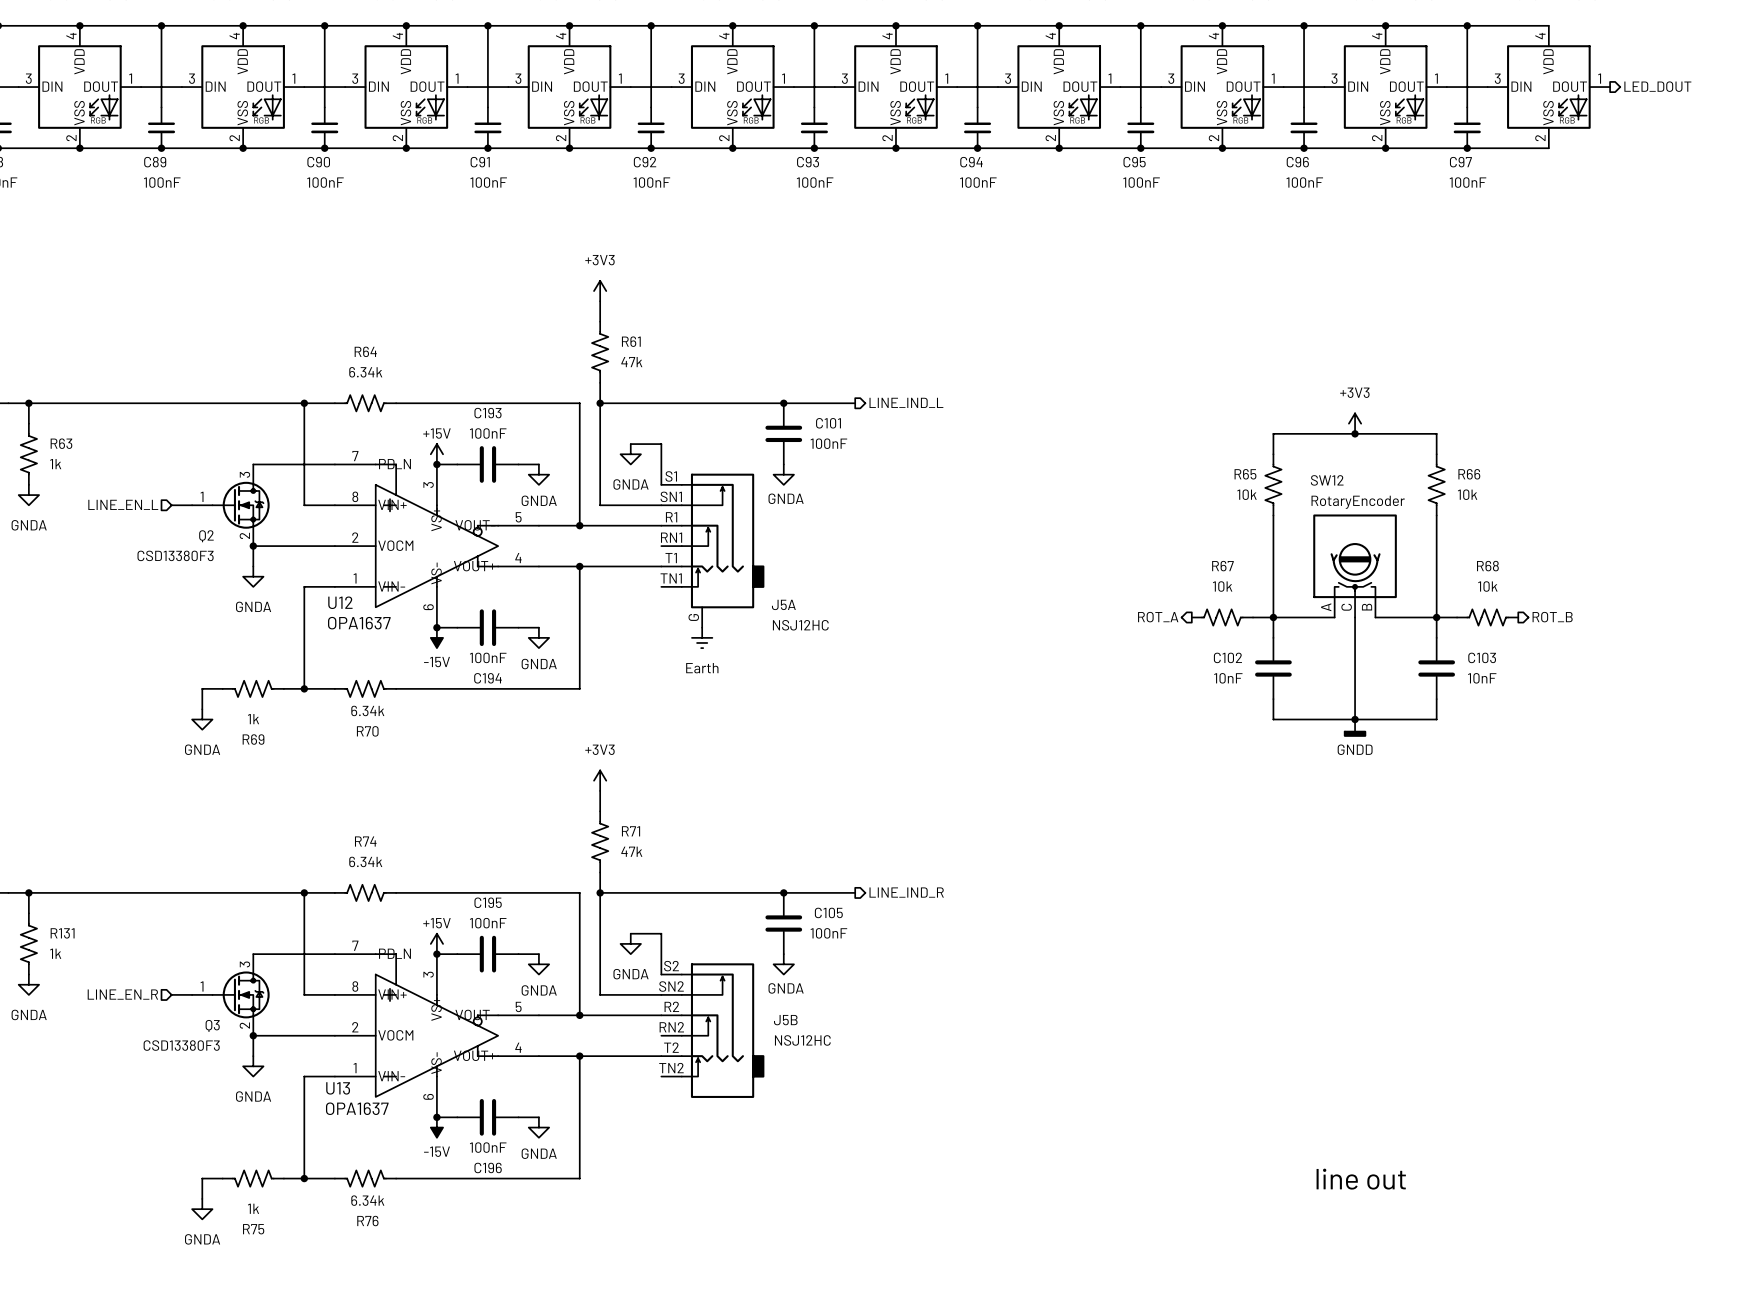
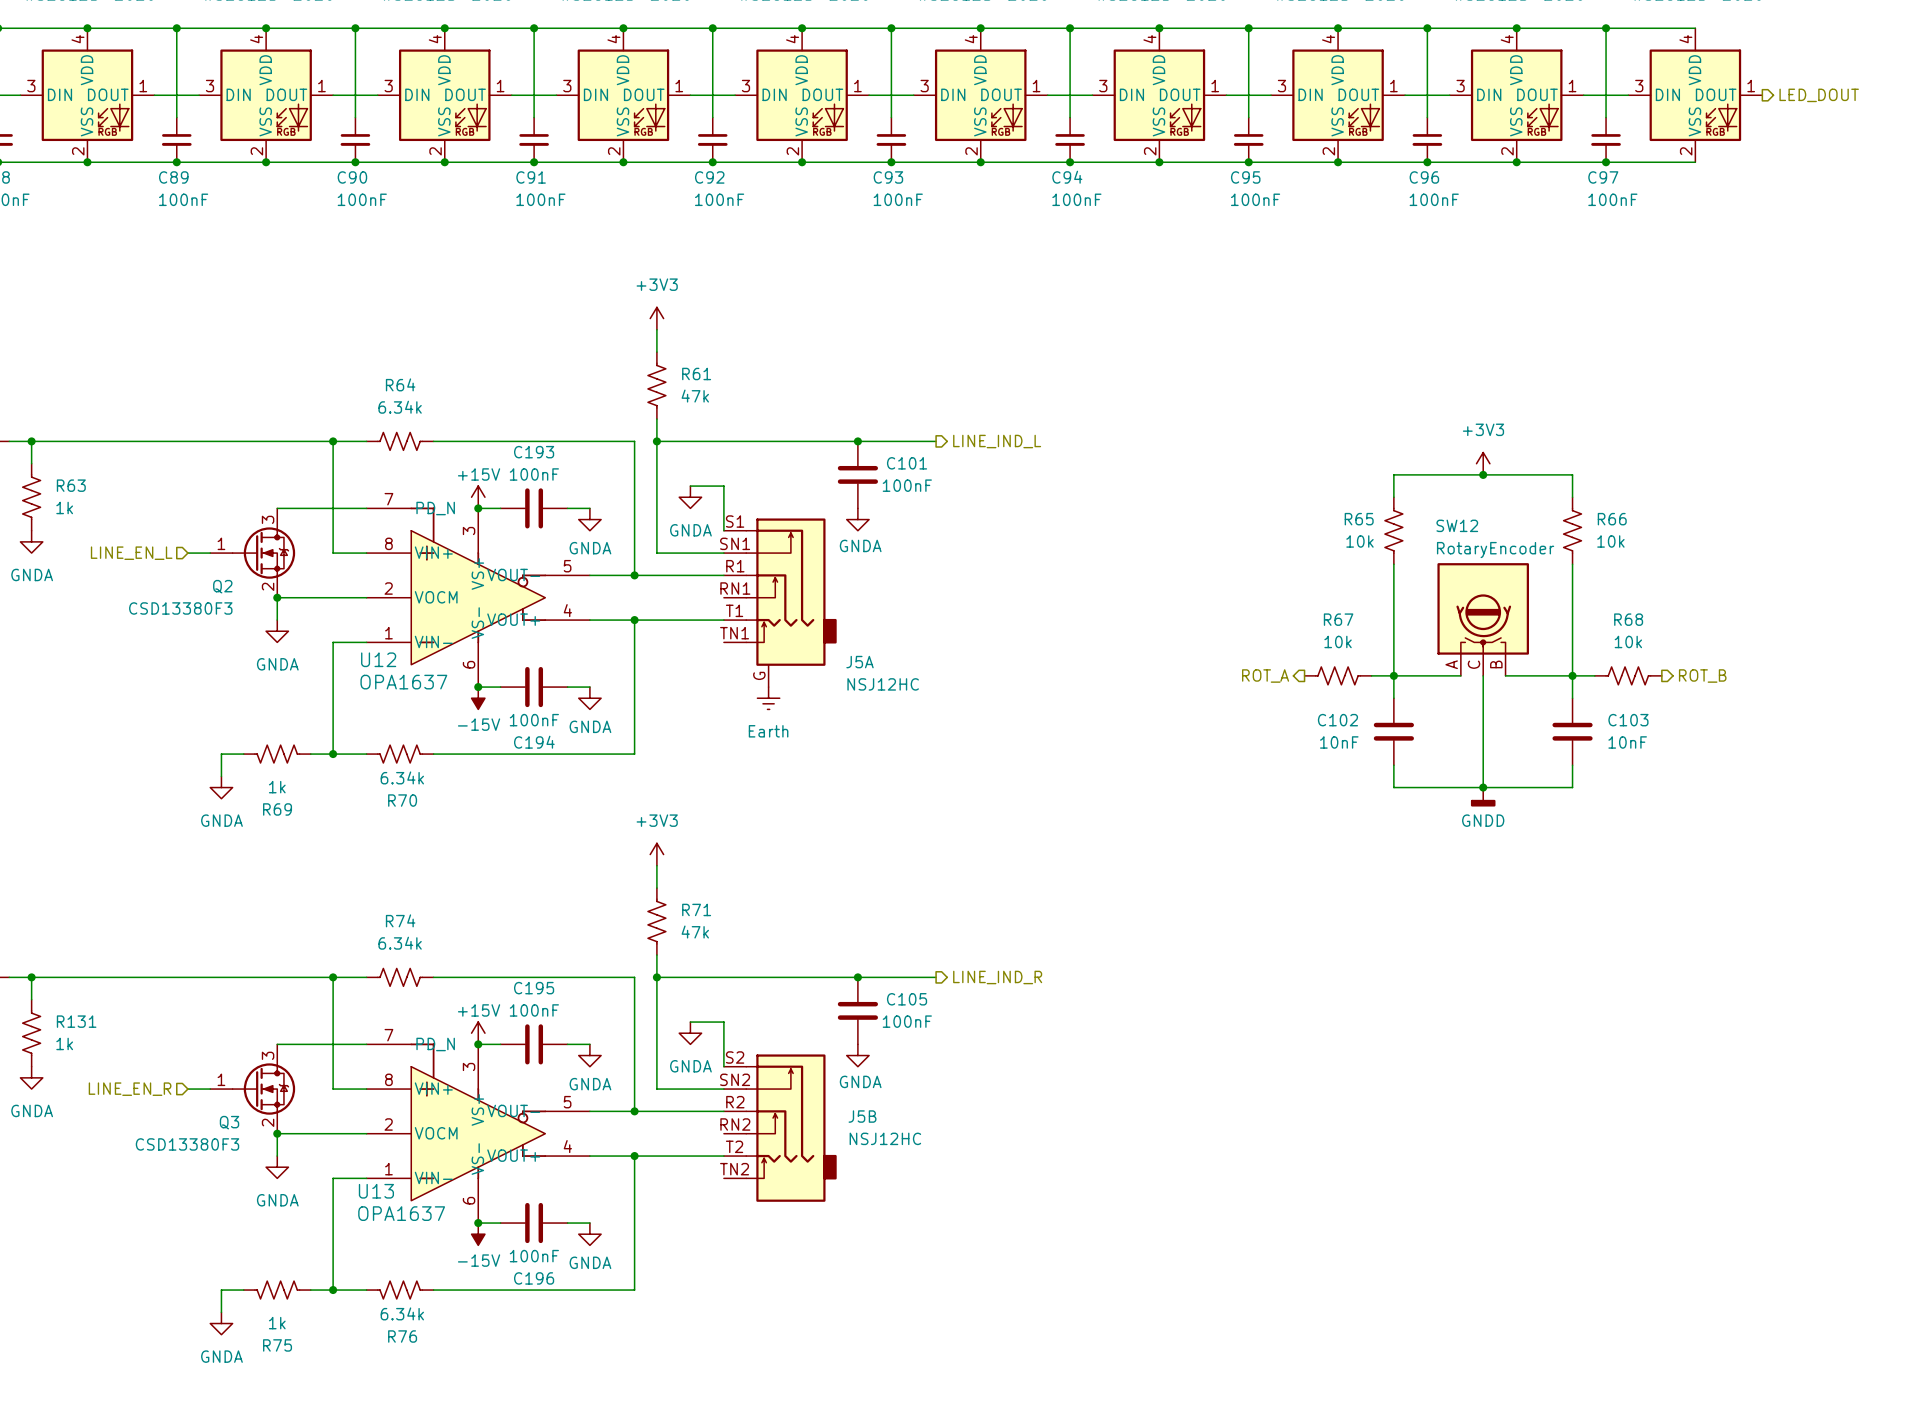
text: line out (1361, 1179) -> none

